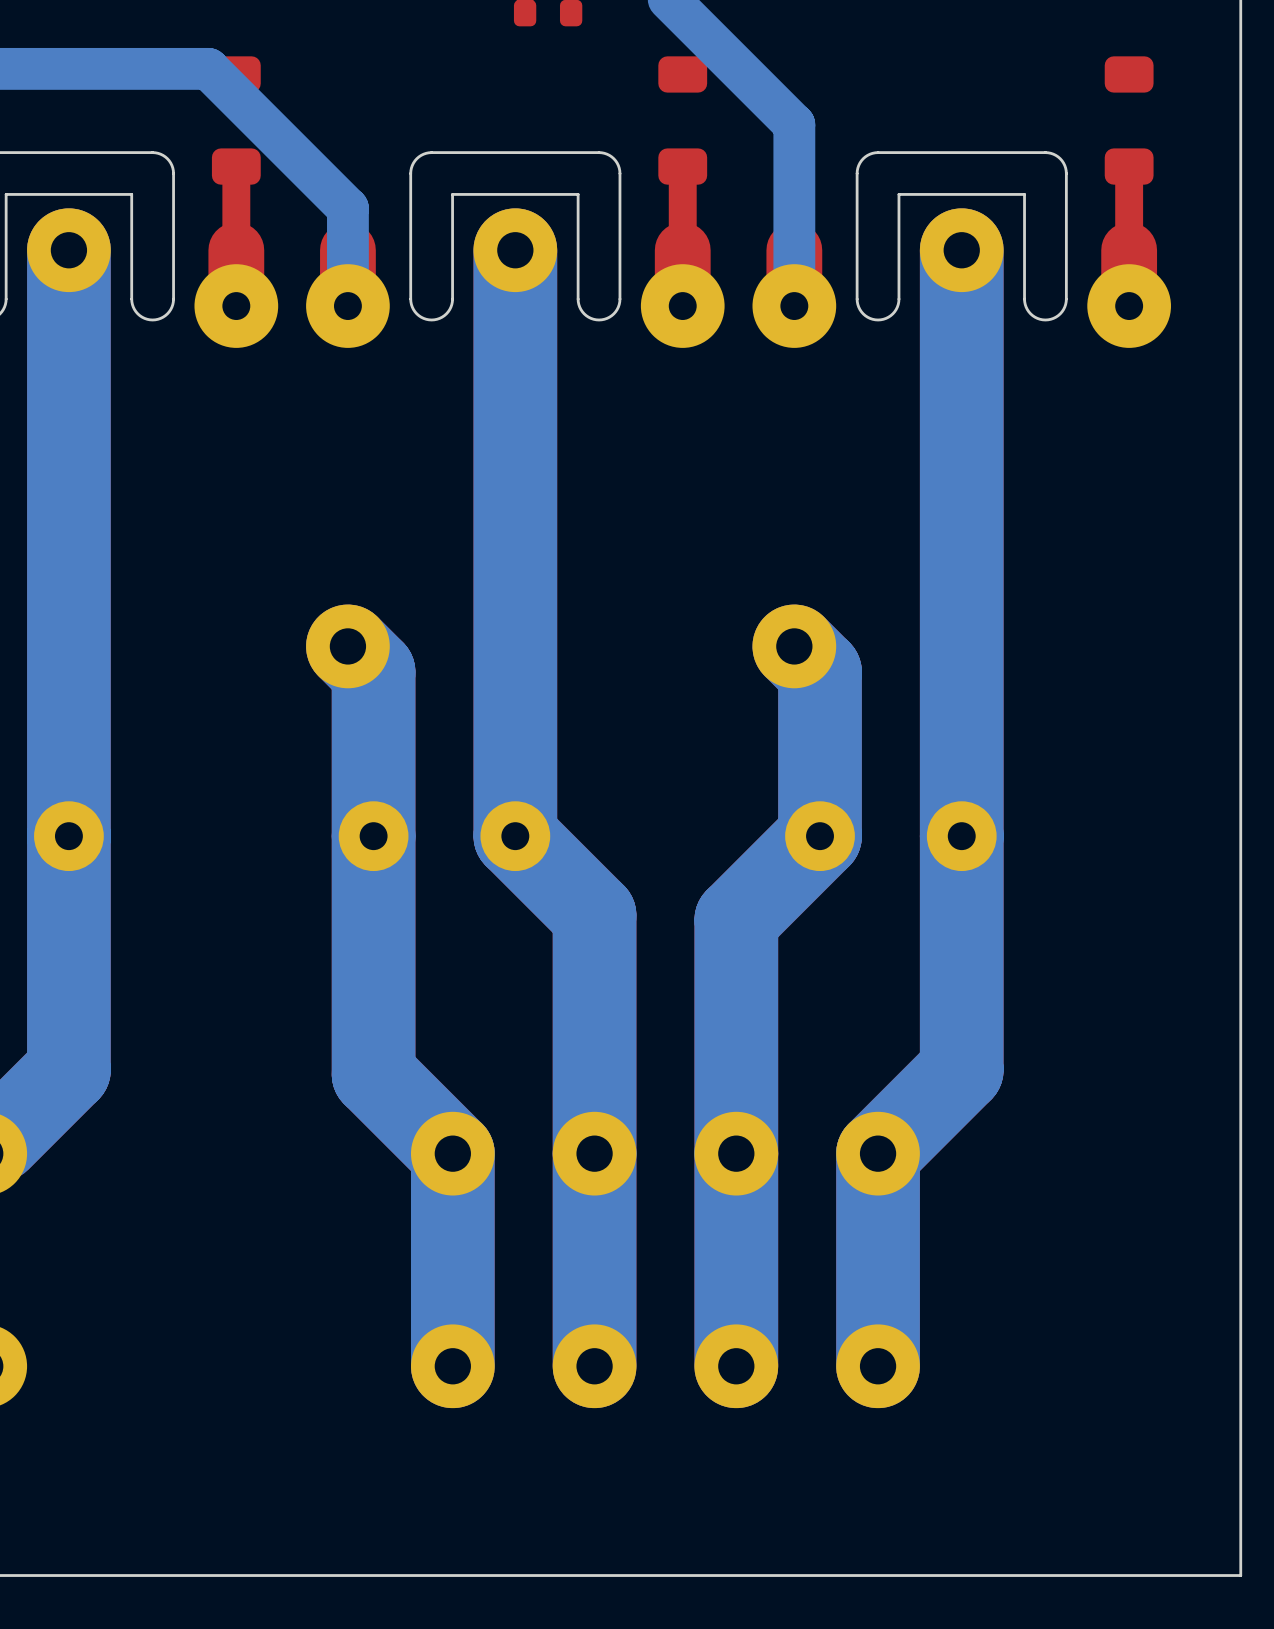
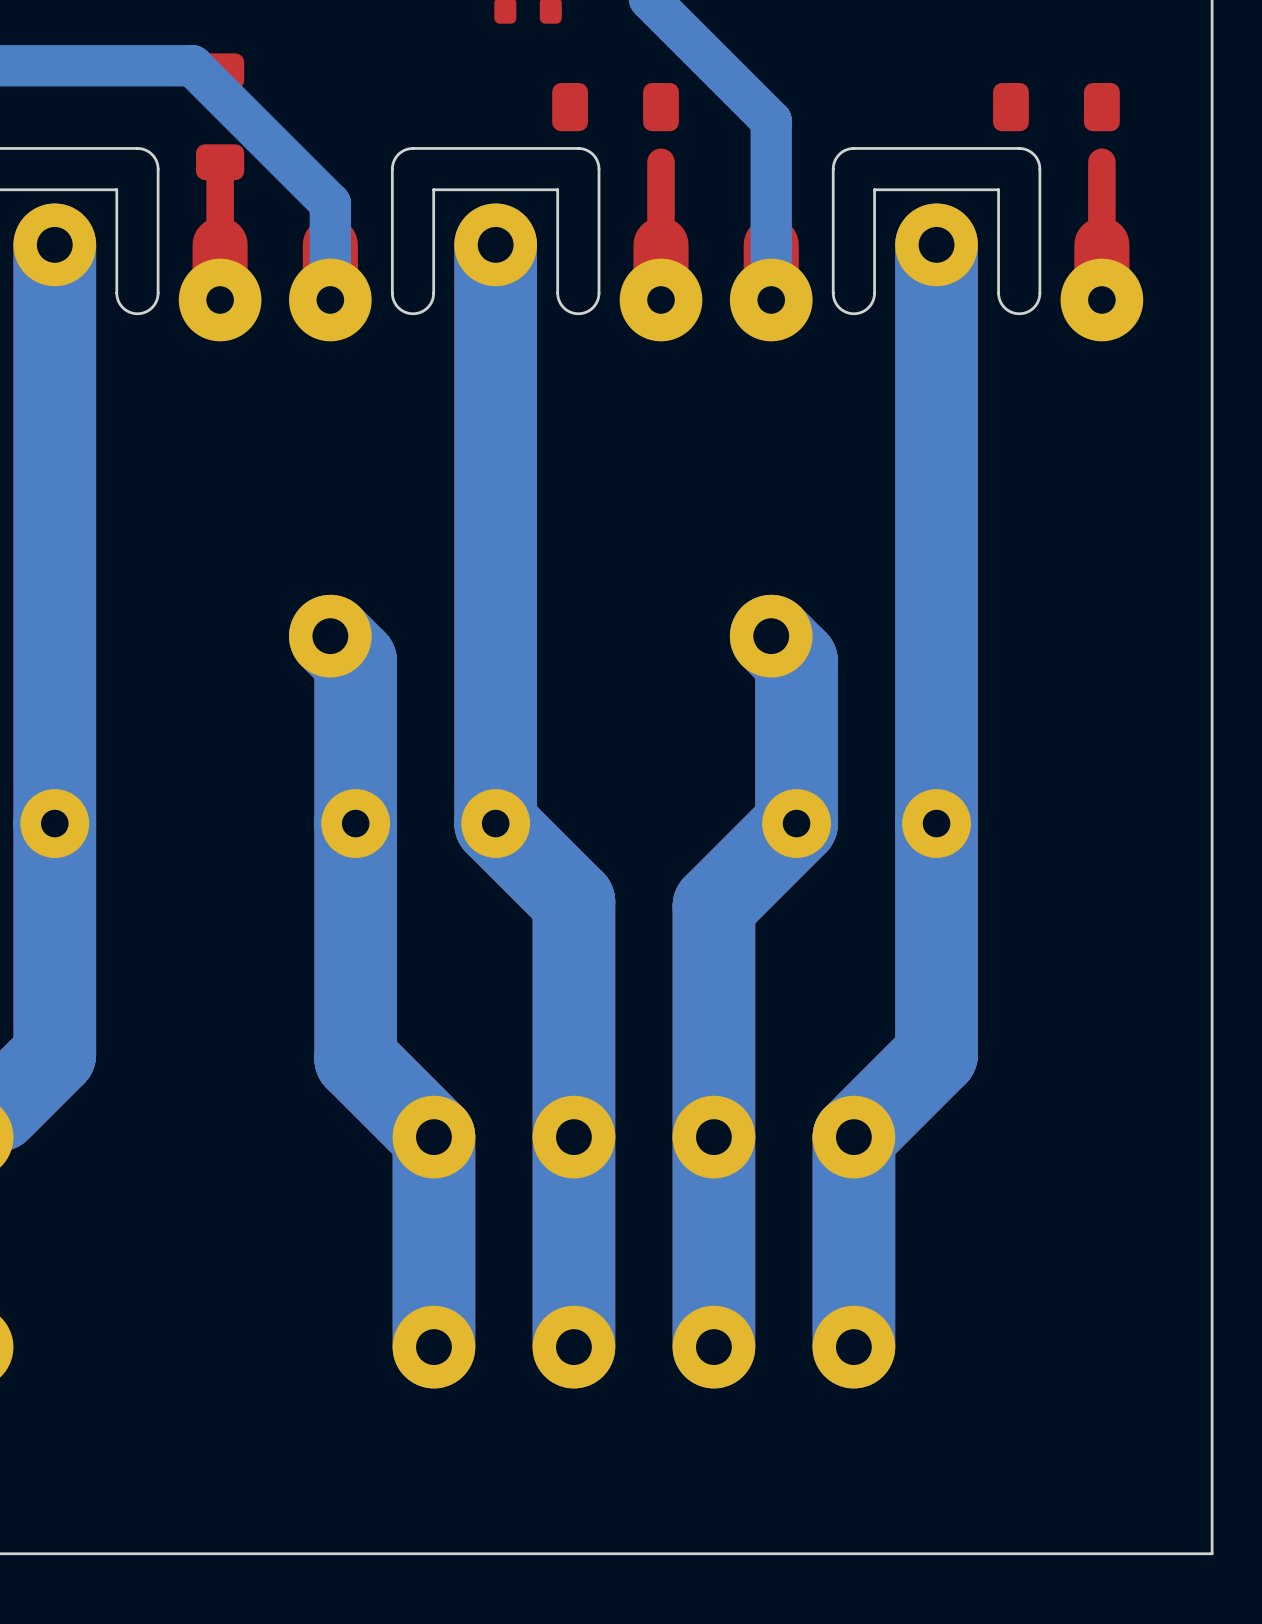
part rotation: 0° (682, 120) -> 90° clockwise (615, 107)
part rotation: 0° (1129, 120) -> 90° clockwise (1056, 107)

